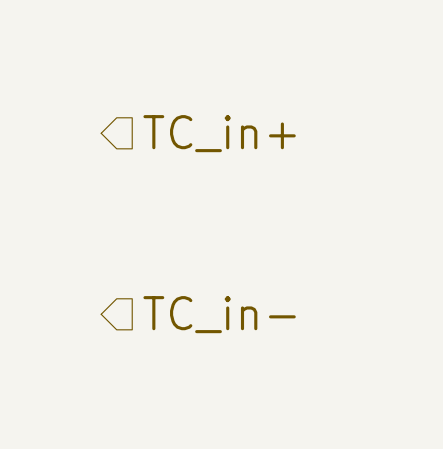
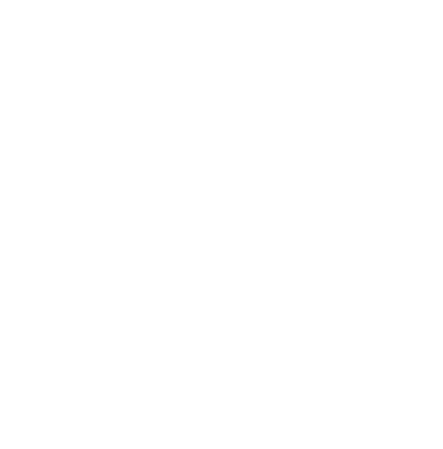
hierarchical label: TC_in+ (219, 133) -> none
hierarchical label: TC_in- (219, 314) -> none

